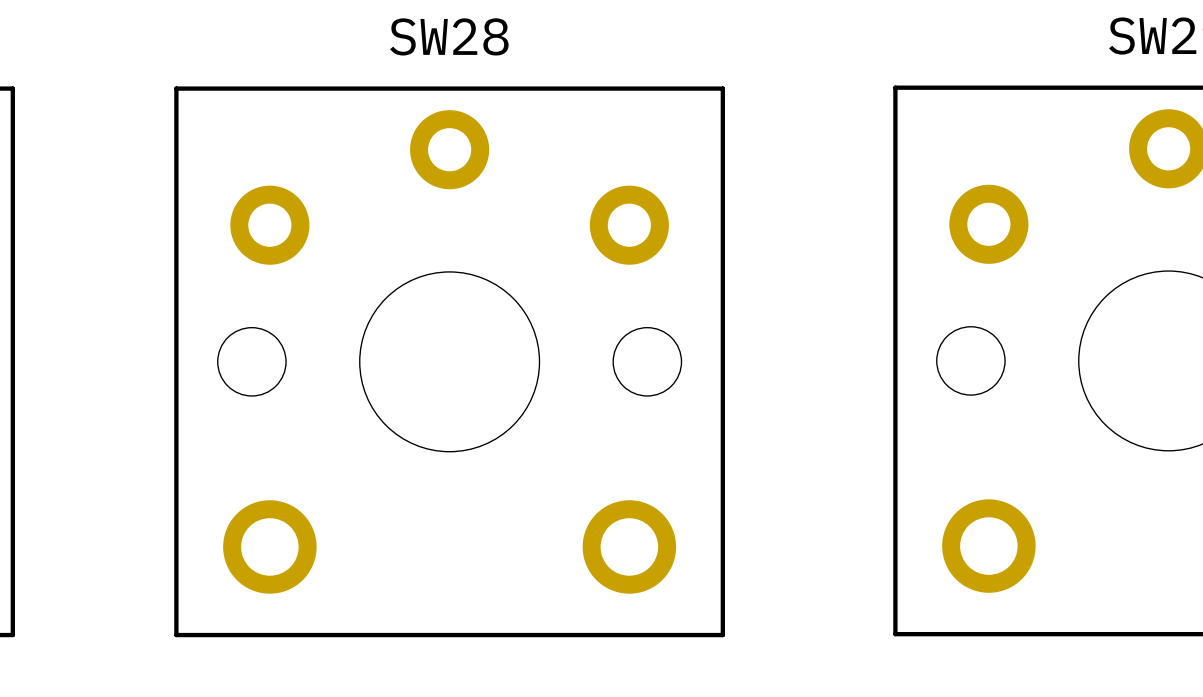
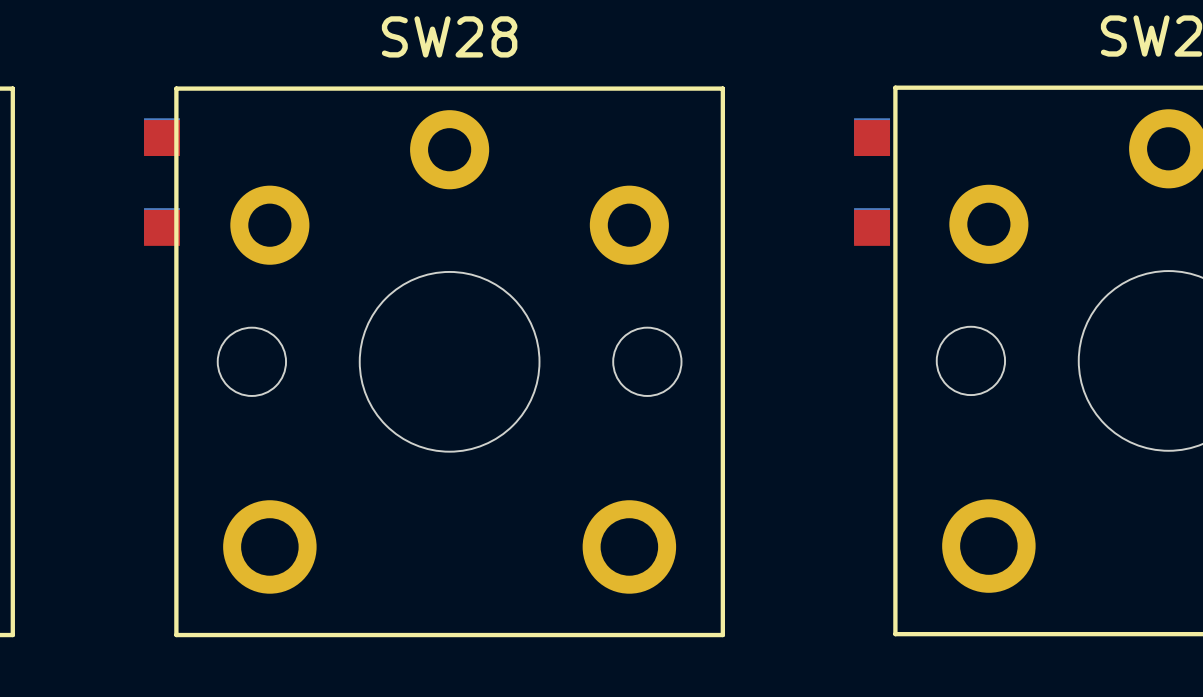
part: none -> (162, 182)
part: none -> (872, 182)

